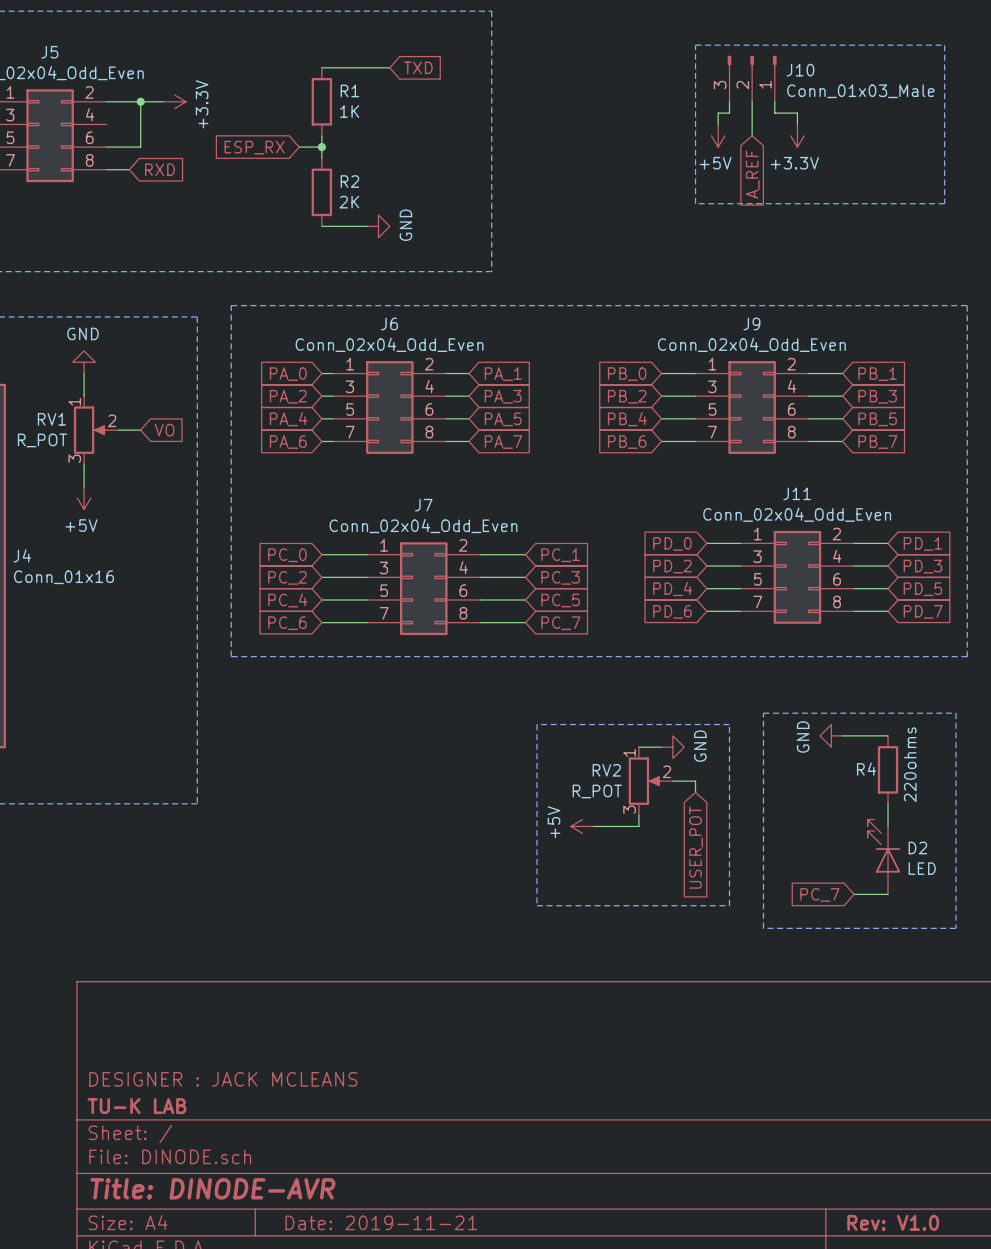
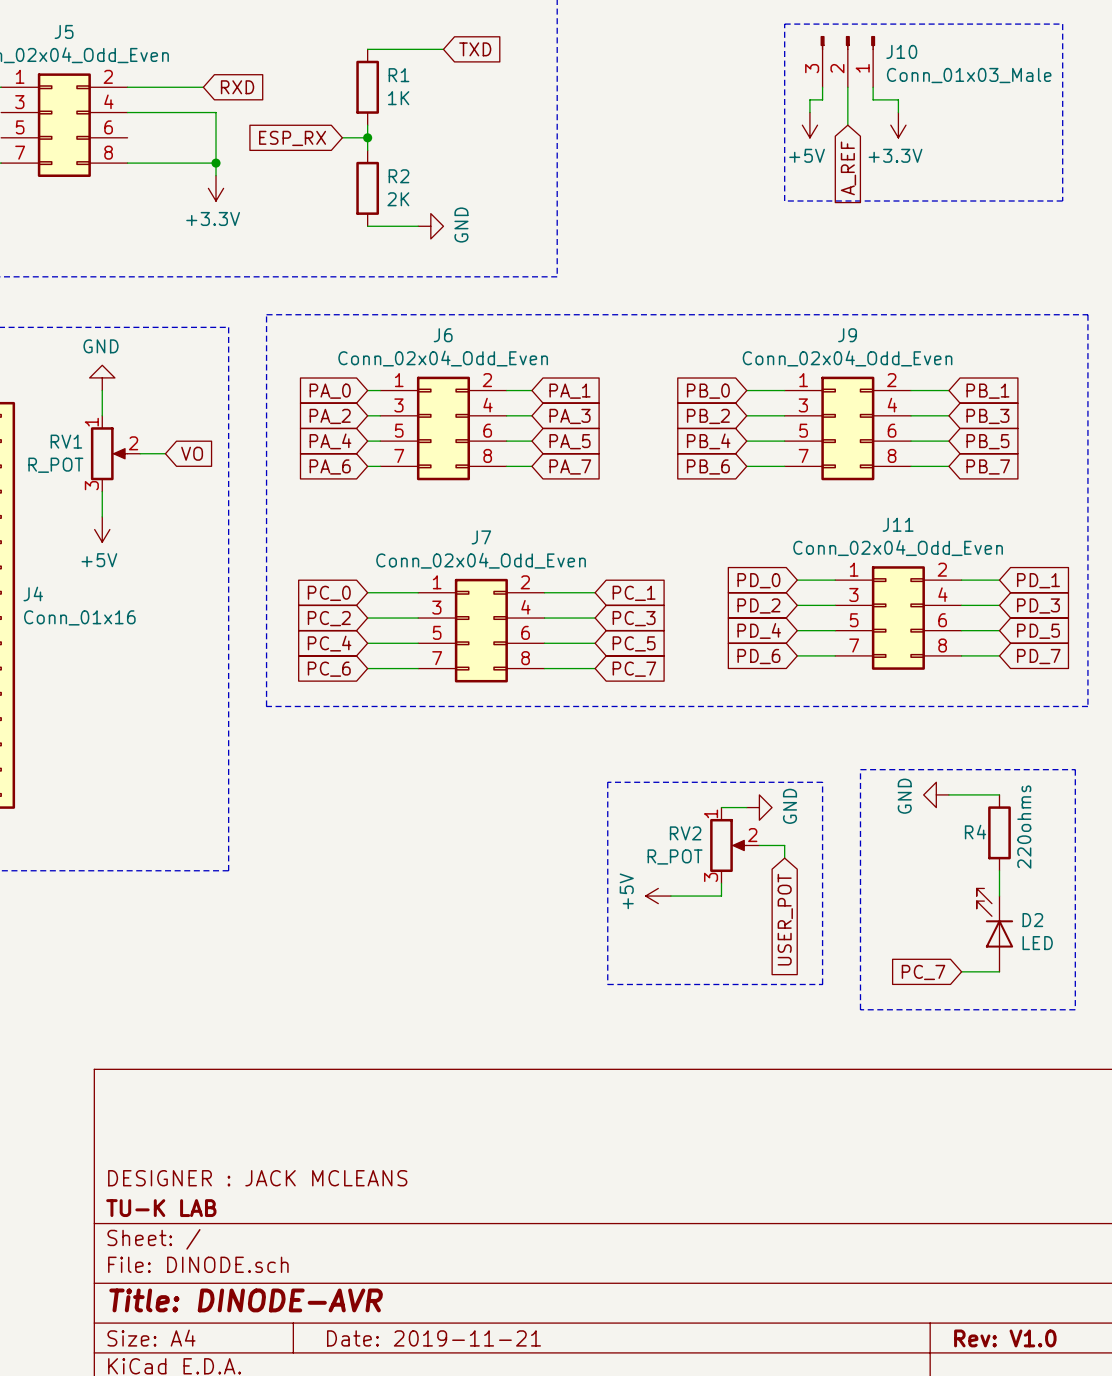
wire: (140, 101) (140, 147) (106, 147) -> none
junction: (140, 101) -> none
power symbol rotation: 0° (174, 101) -> 90° clockwise (216, 188)
power symbol position: +3.3V (174, 101) -> +3.3V (216, 188)
wire: none -> (127, 112) (216, 112) (216, 175)
wire: none -> (152, 163) (216, 163)
global label position: RXD (159, 169) -> RXD (237, 87)
junction: none -> (216, 163)

